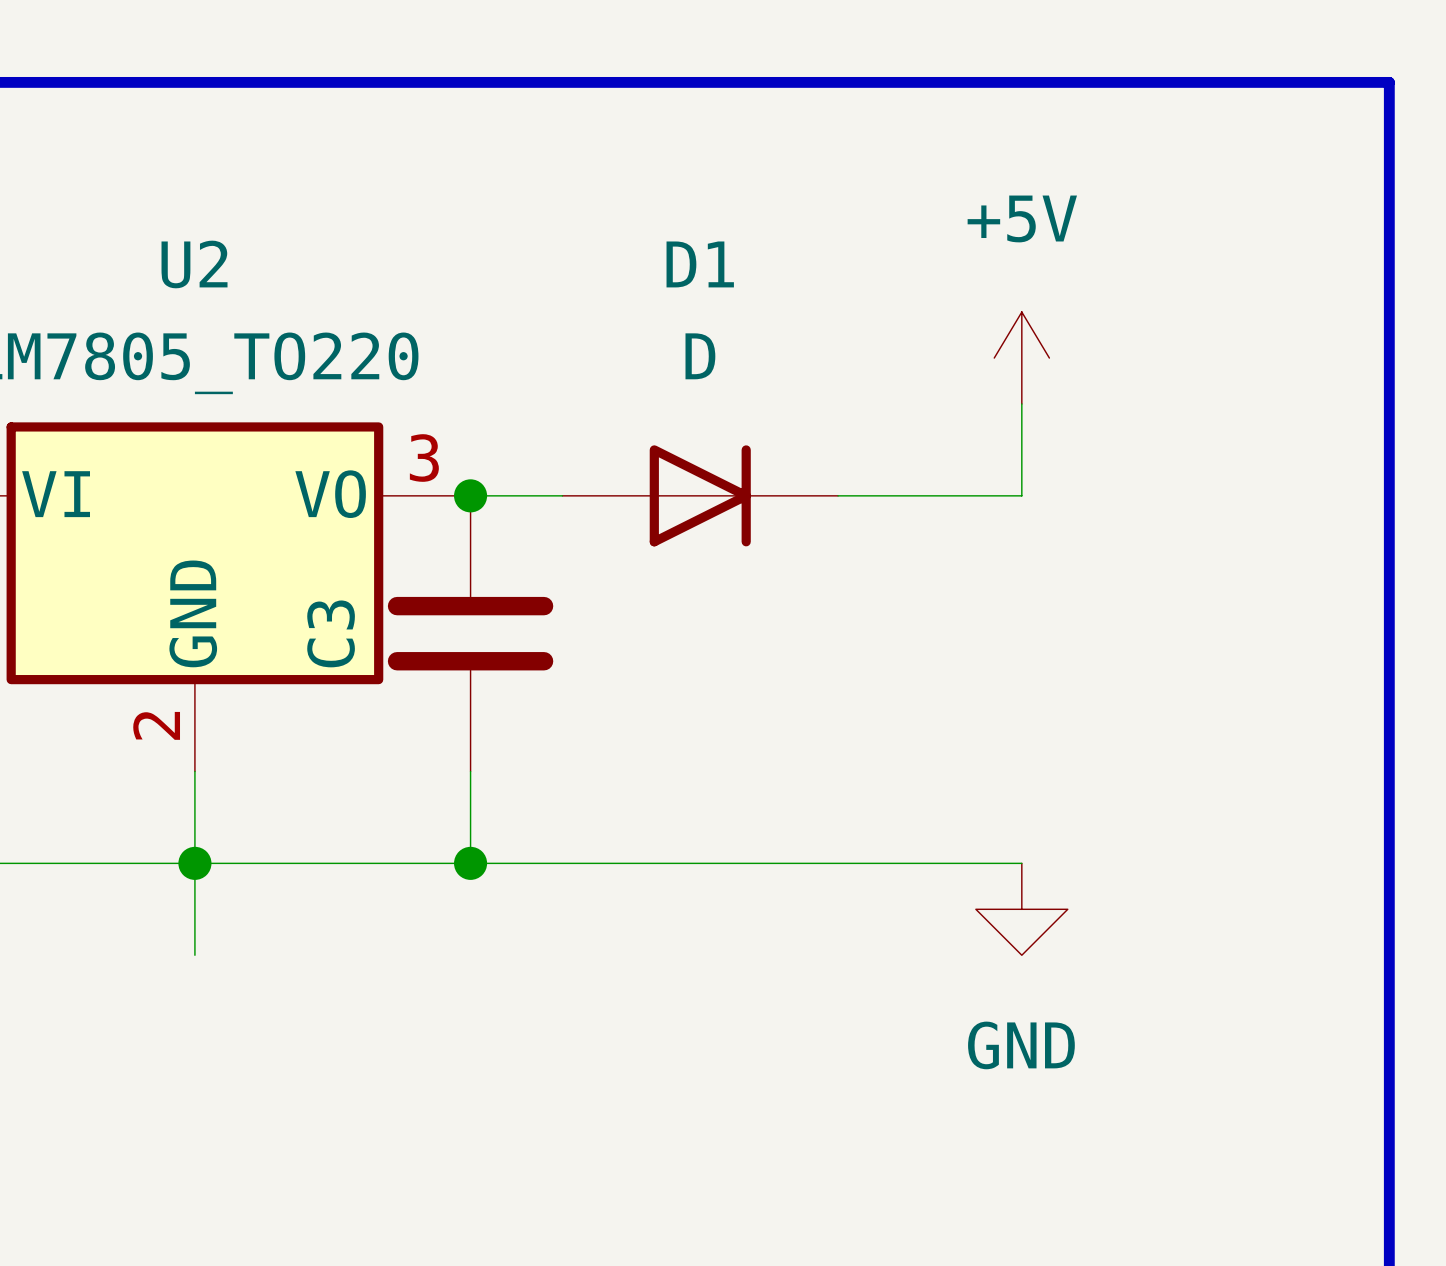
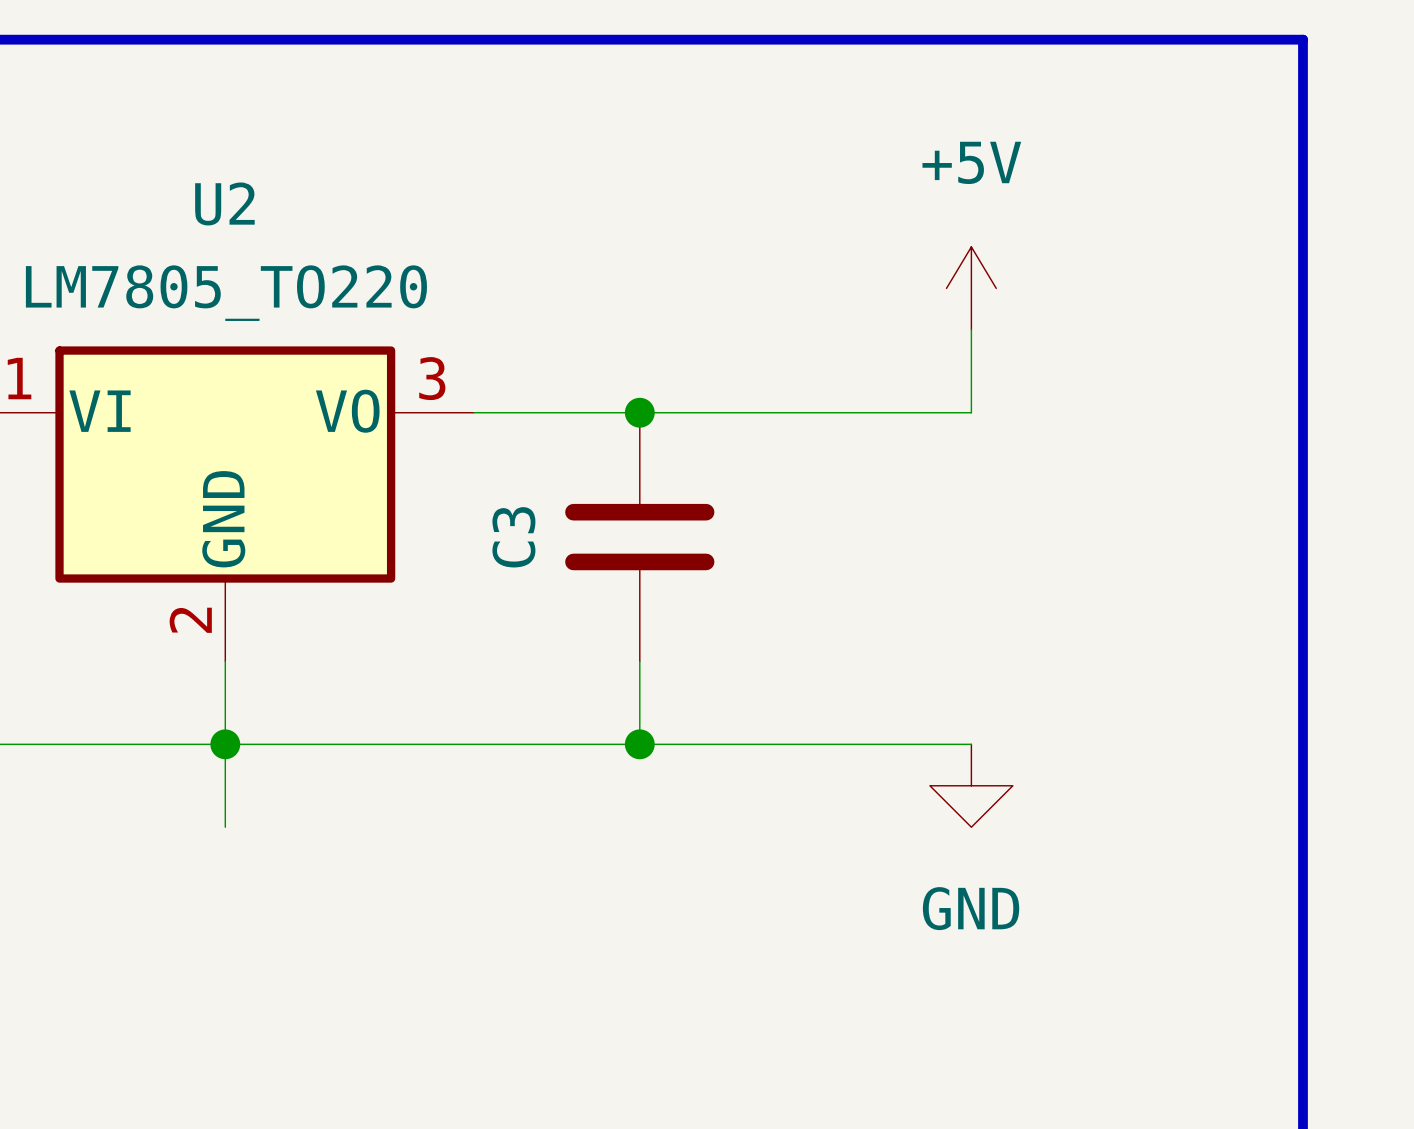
junction position: (470, 495) -> (639, 412)
D1: D (700, 495) -> none
C3 position: (470, 633) -> (639, 537)
wire: (470, 771) (470, 863) -> (639, 661) (639, 744)
junction position: (470, 863) -> (639, 744)

